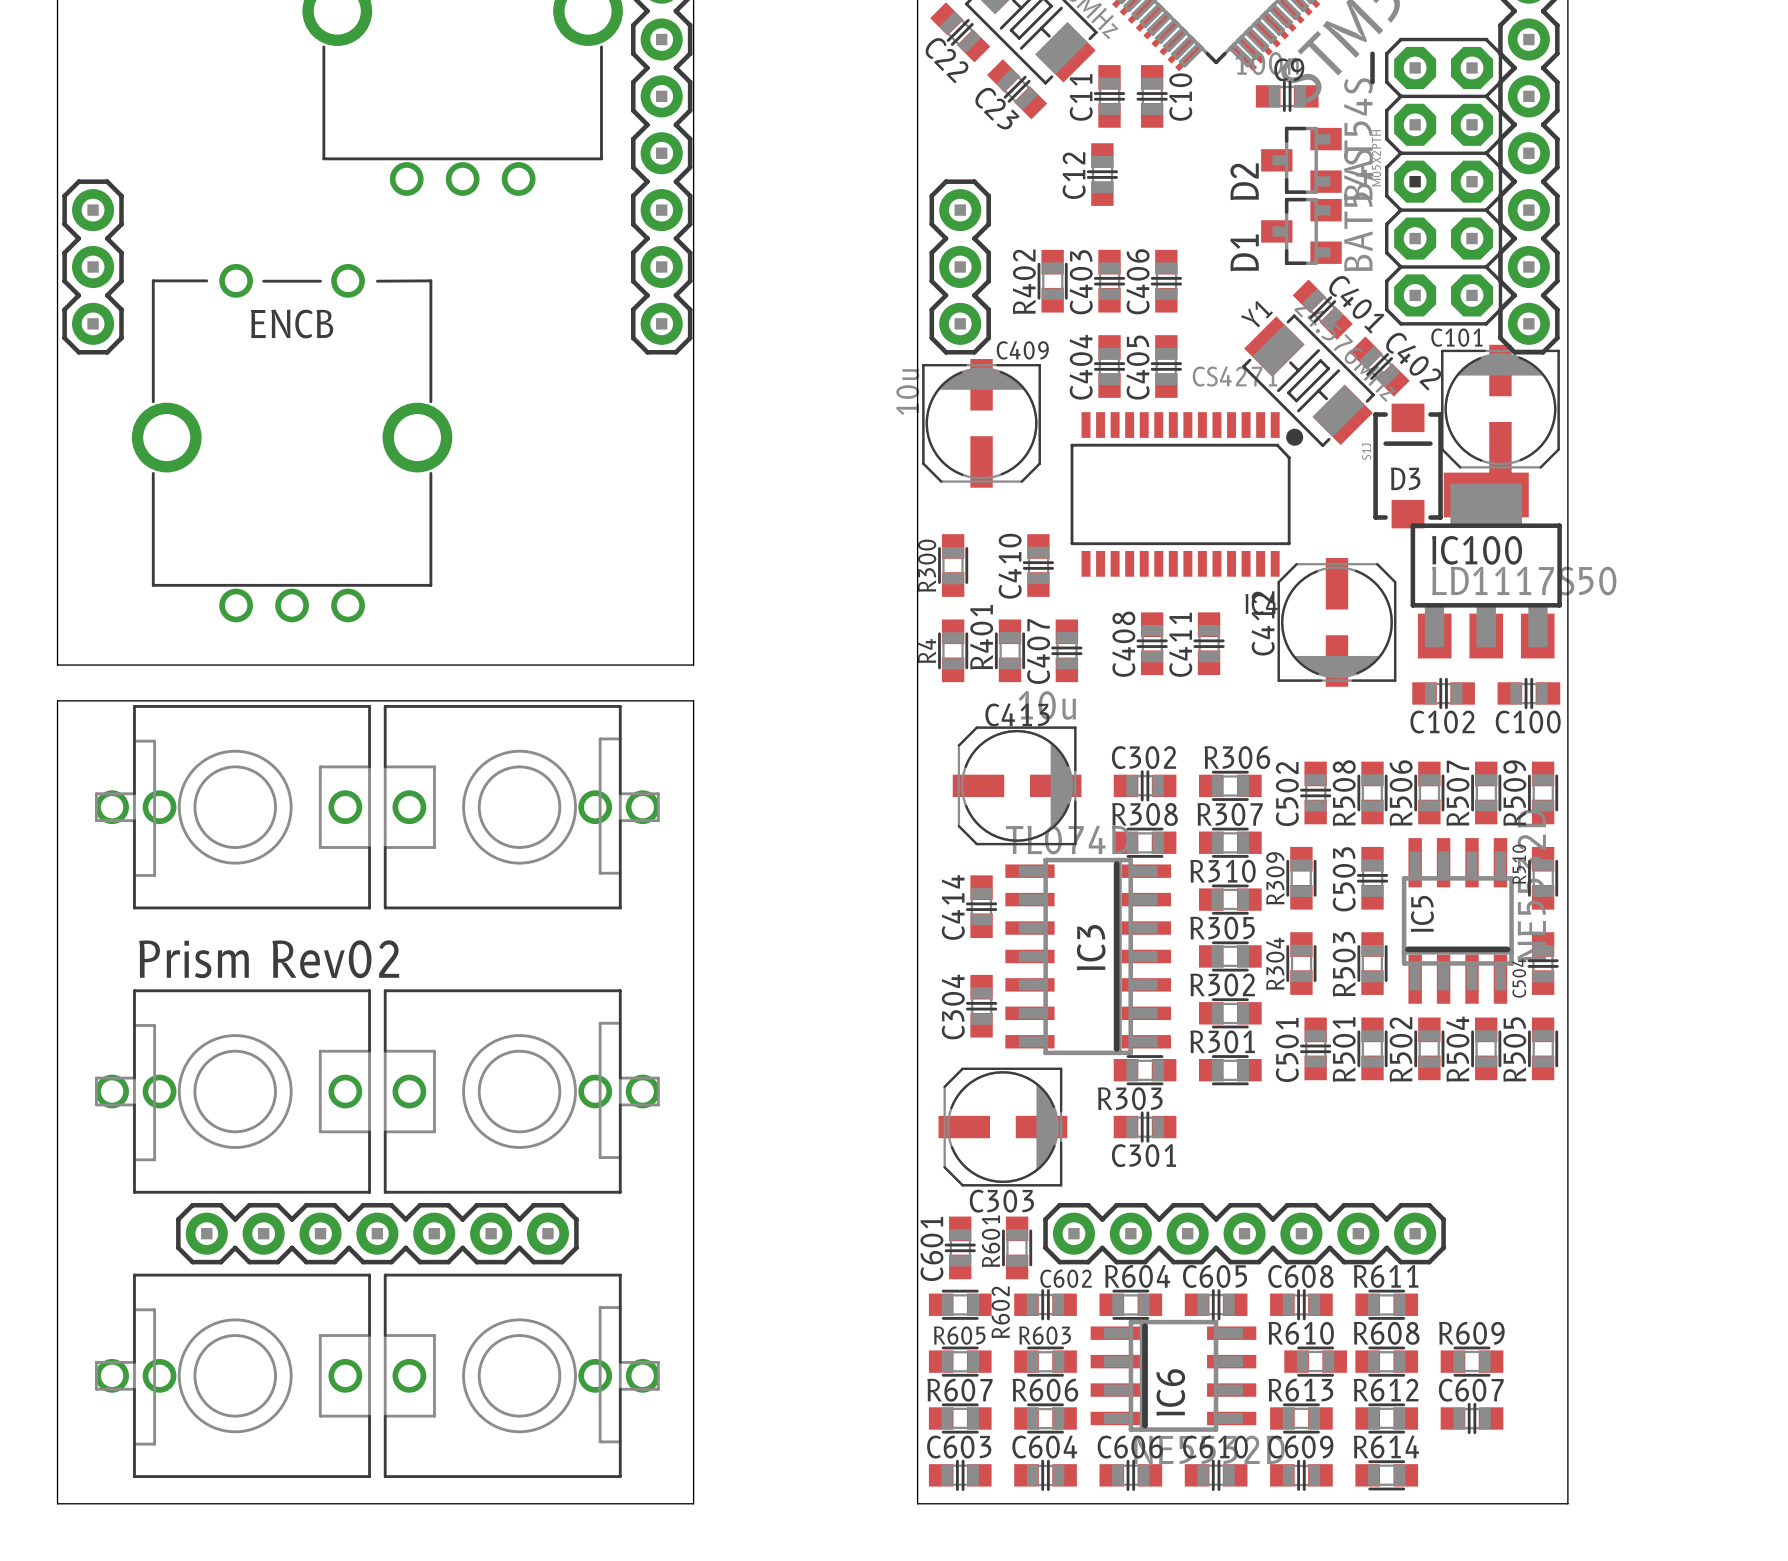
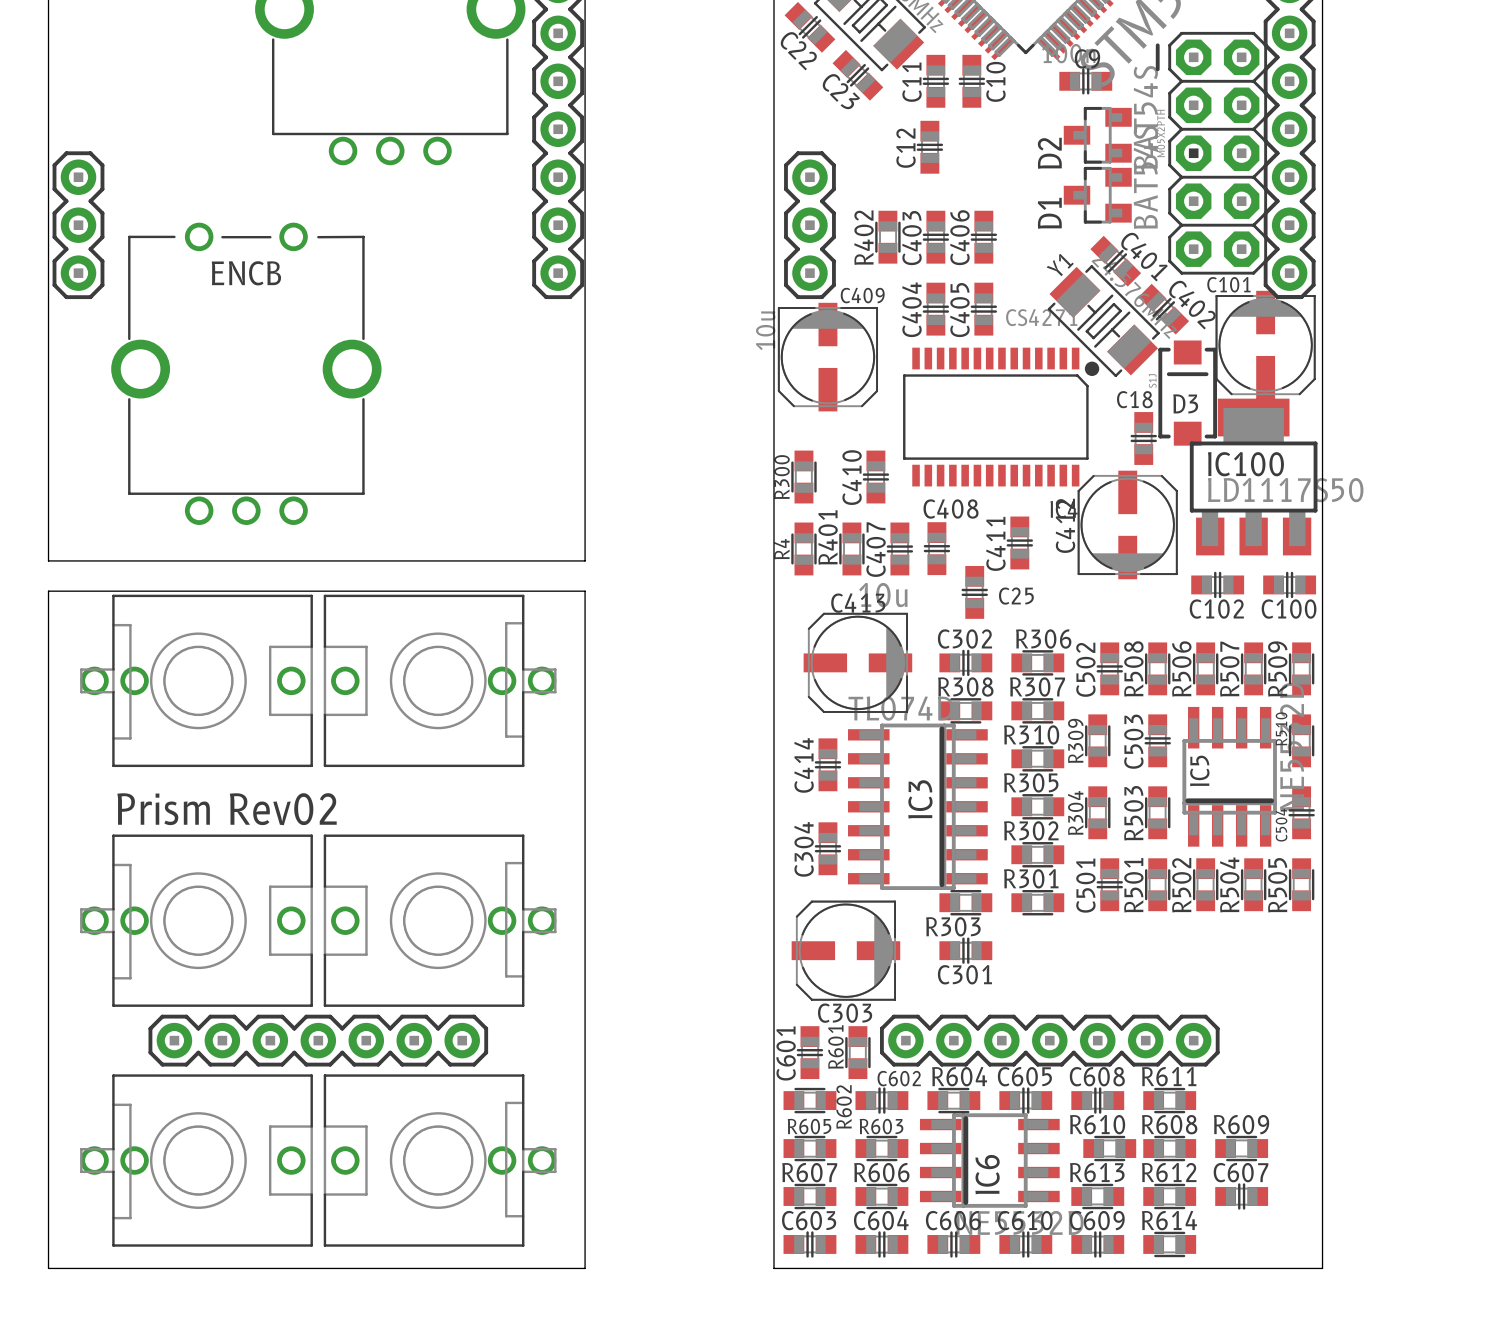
C18: none -> (1143, 438)
C408 position: (1152, 643) -> (936, 548)
C408 name rotation: 0° (1123, 644) -> 90° clockwise (951, 508)
C25: none -> (974, 592)

